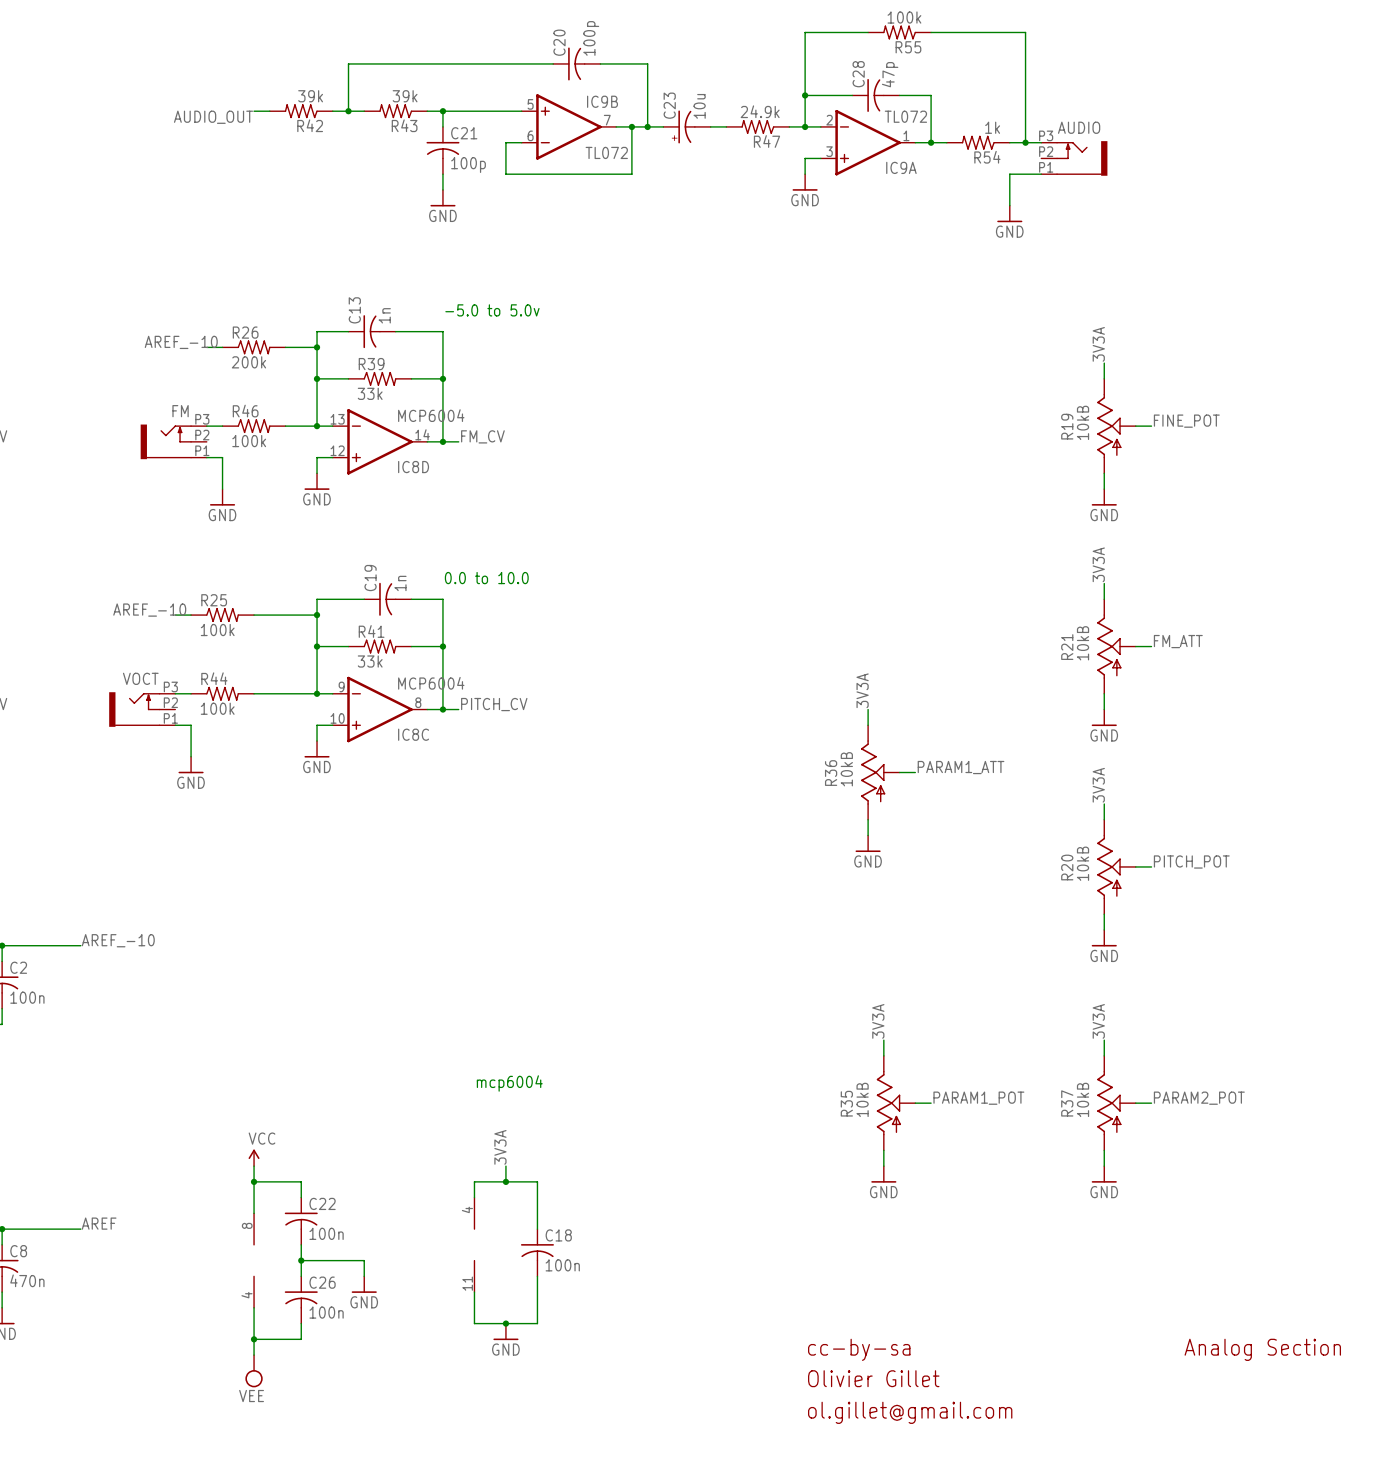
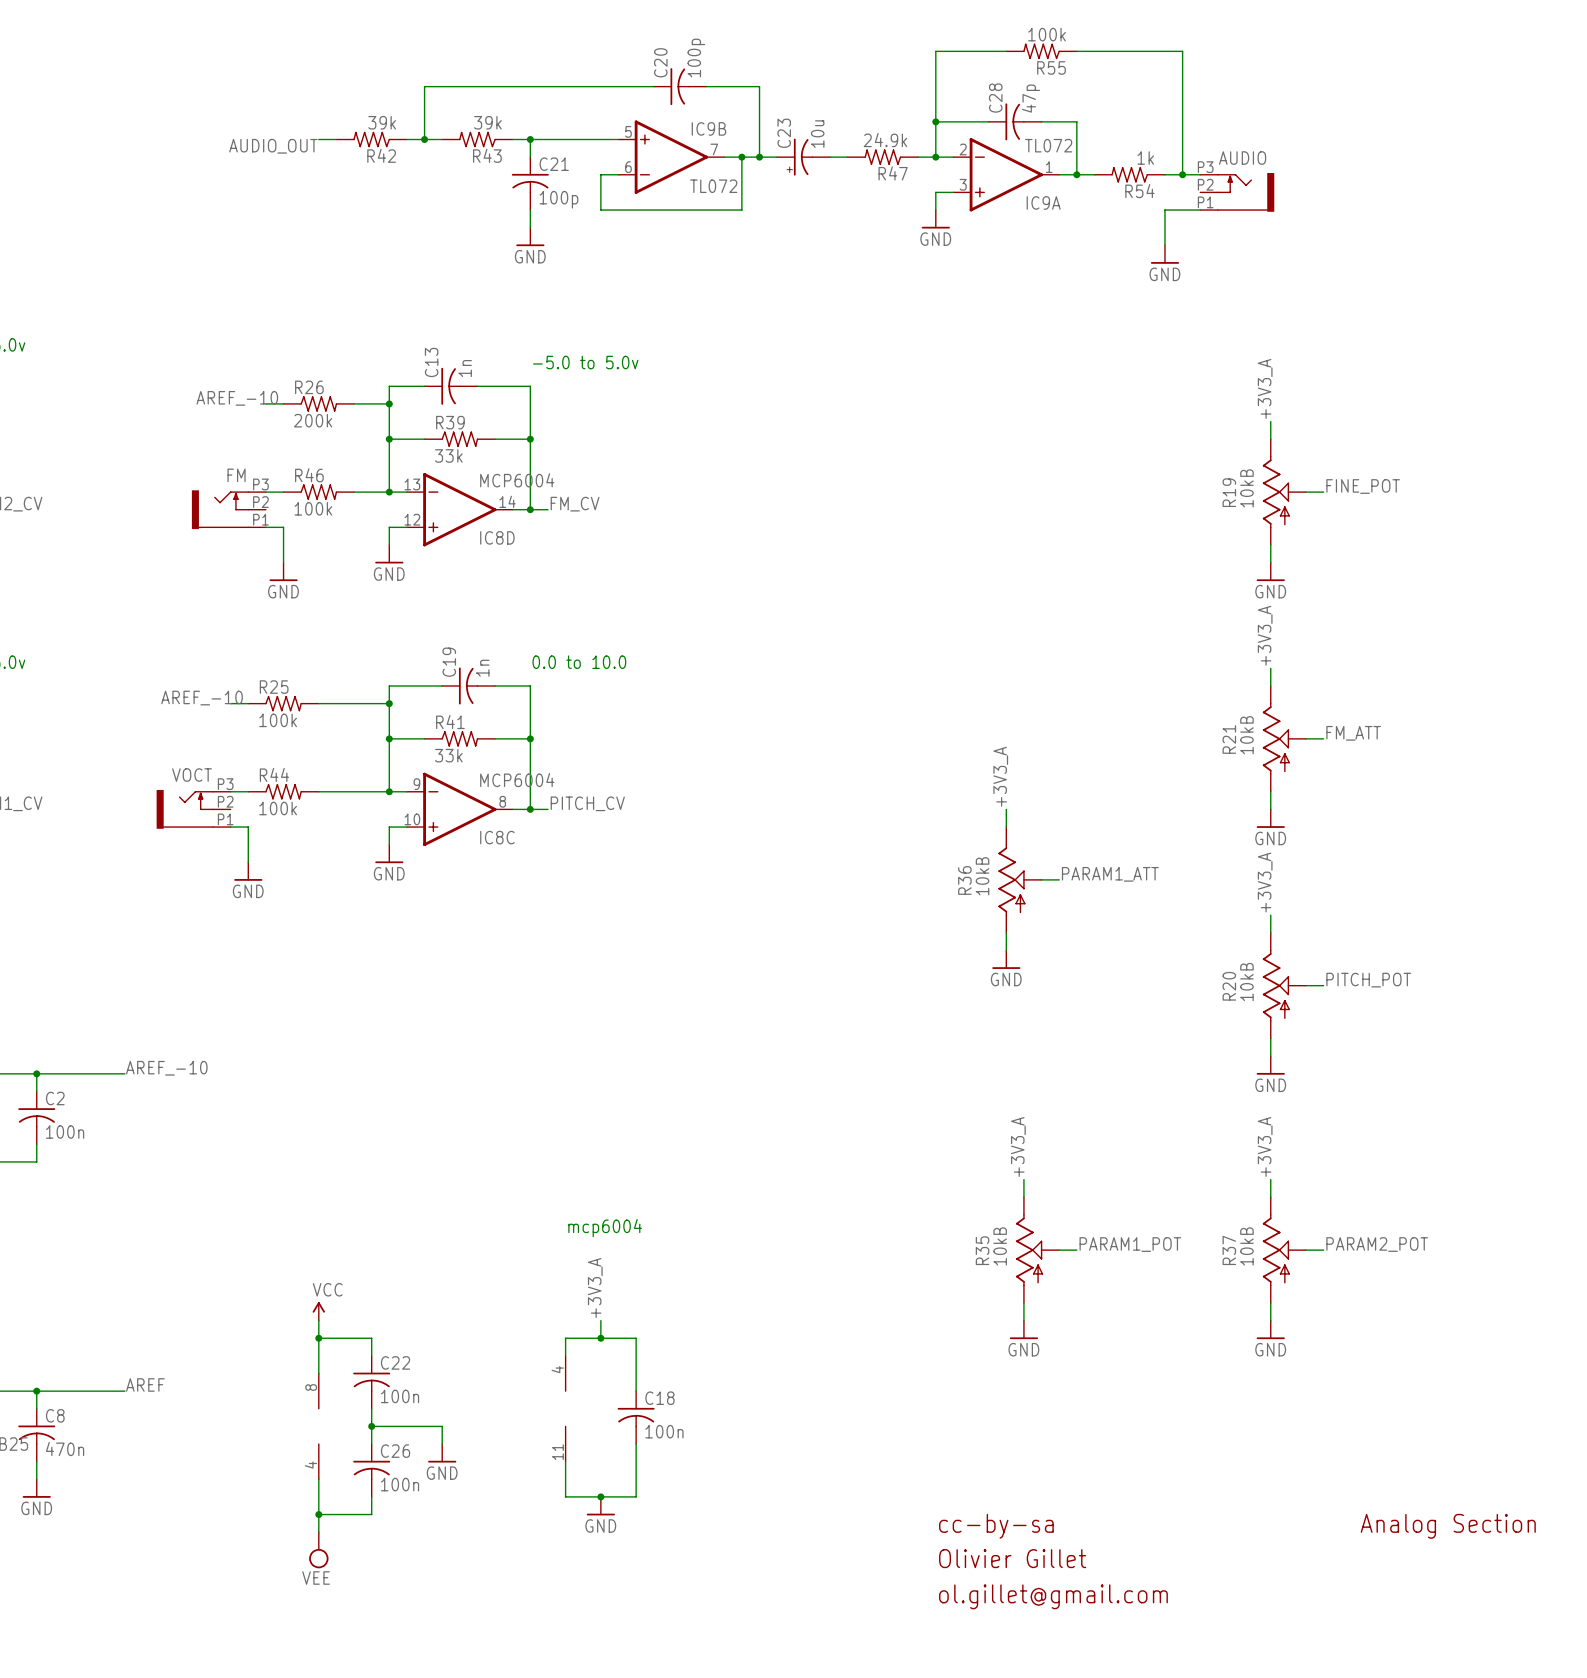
label: 3V3A (1098, 344) -> +3V3_A (1265, 388)
label: 3V3A (1098, 564) -> +3V3_A (1265, 635)
label: 3V3A (862, 690) -> +3V3_A (1000, 776)
label: 3V3A (1098, 785) -> +3V3_A (1265, 882)
label: 3V3A (878, 1021) -> +3V3_A (1018, 1146)
label: 3V3A (1098, 1021) -> +3V3_A (1265, 1146)
label: 3V3A (500, 1147) -> +3V3_A (595, 1287)

